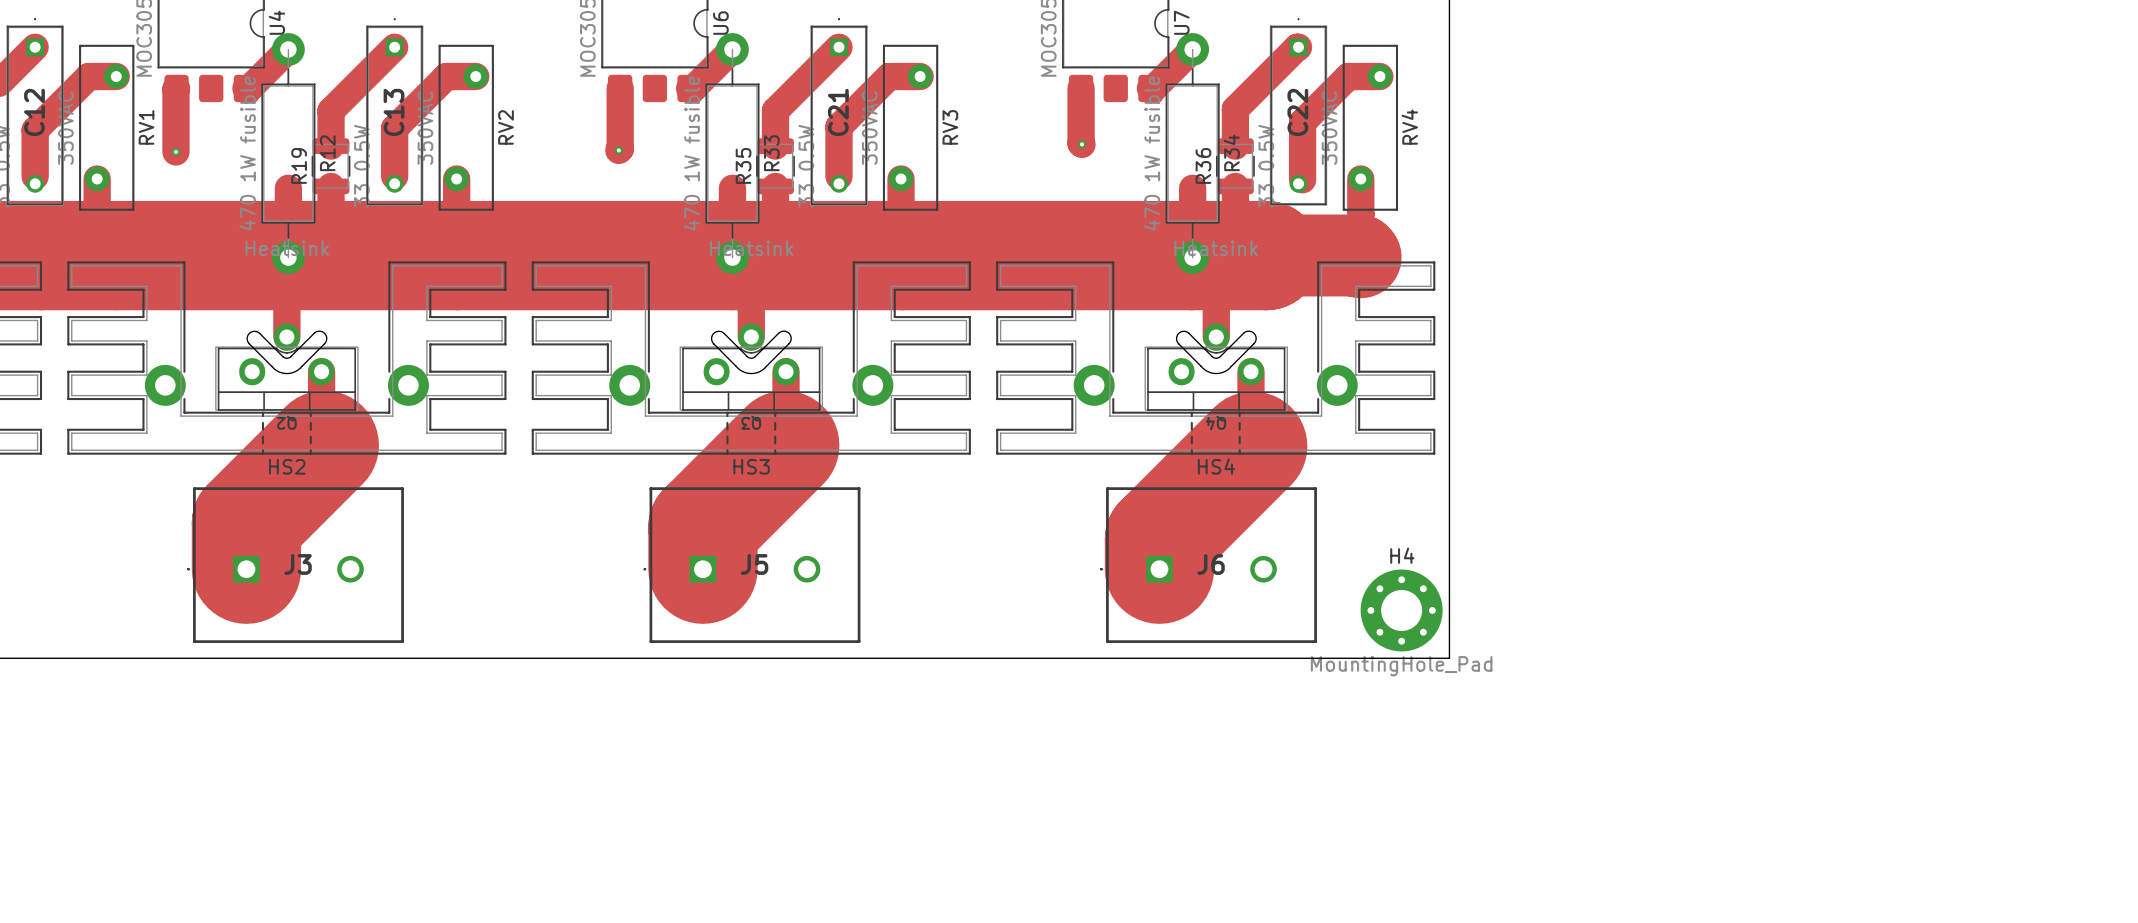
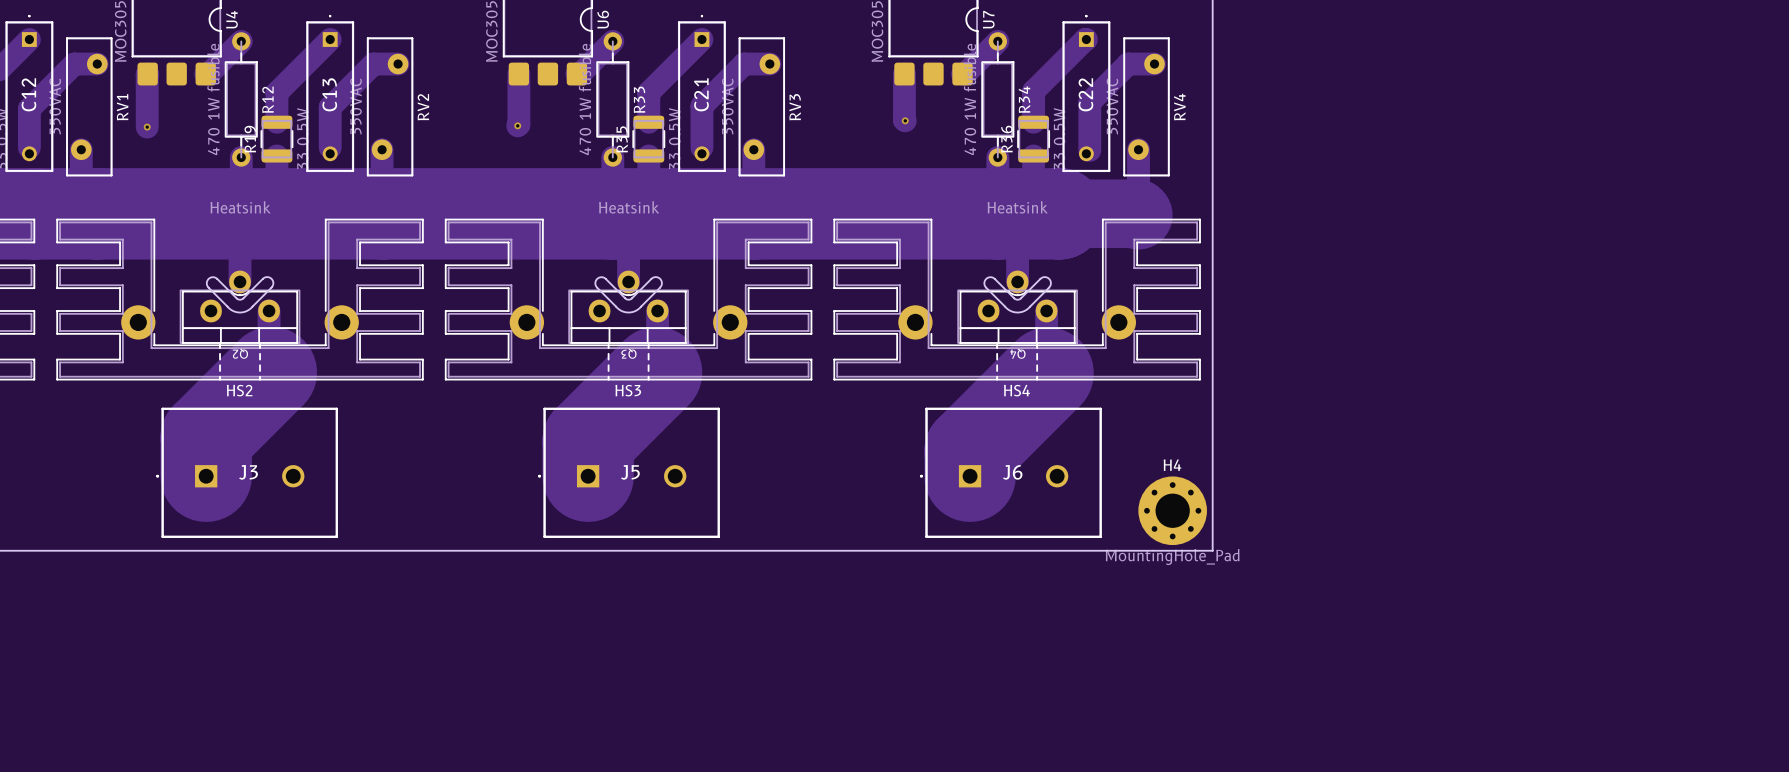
R12 footprint: [261, 33, 316, 275] -> [224, 32, 258, 167]
R33 footprint: [705, 33, 760, 275] -> [596, 32, 630, 167]
R34 footprint: [1165, 33, 1220, 275] -> [981, 32, 1015, 167]

